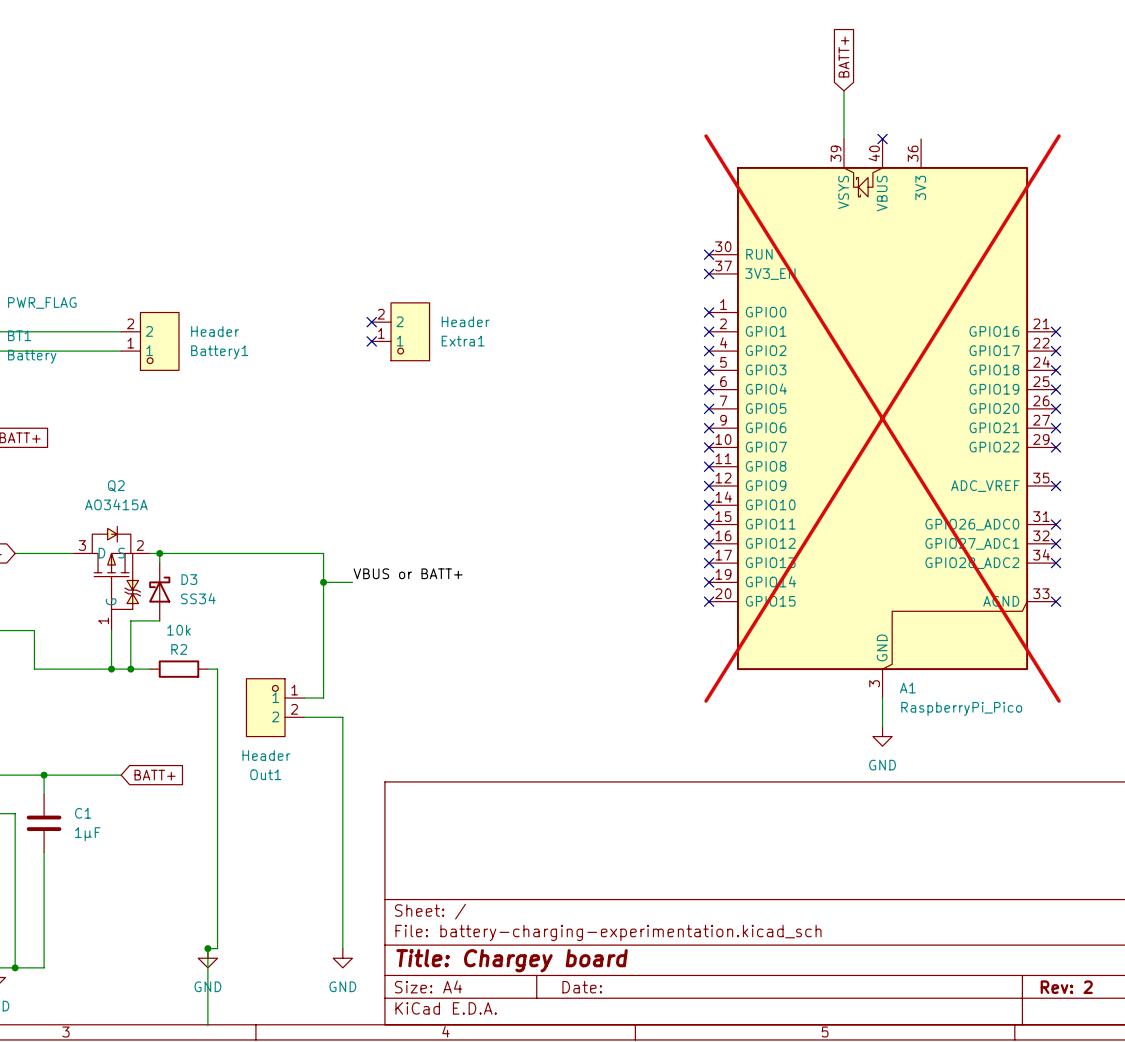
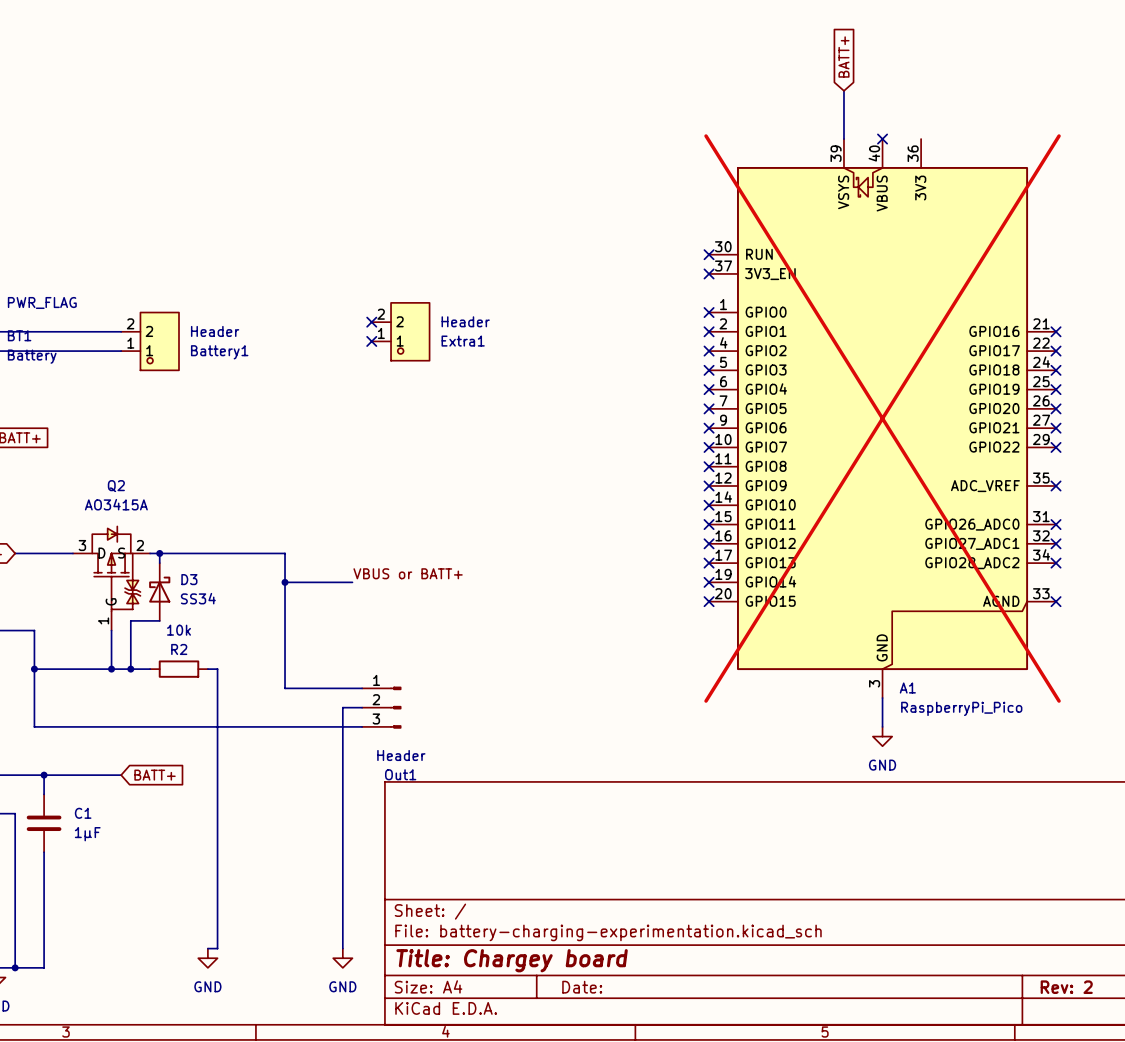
wire: (285, 553) (323, 553) (323, 698) (304, 698) -> (285, 553) (285, 688) (362, 688)
wire: none -> (285, 582) (323, 582)
junction position: (323, 582) -> (285, 582)
wire: none -> (34, 669) (34, 726) (362, 726)
junction: none -> (34, 669)
Out1 symbol: [246, 678, 305, 737] -> [362, 686, 402, 729]
wire: (304, 717) (342, 717) -> (362, 707) (342, 707) (342, 717)
Out1 value position: Header (266, 755) -> Header (401, 755)
Out1 name position: Out1 (265, 774) -> Out1 (400, 774)
wire: (207, 948) (207, 1025) -> none
junction: (207, 948) -> none

